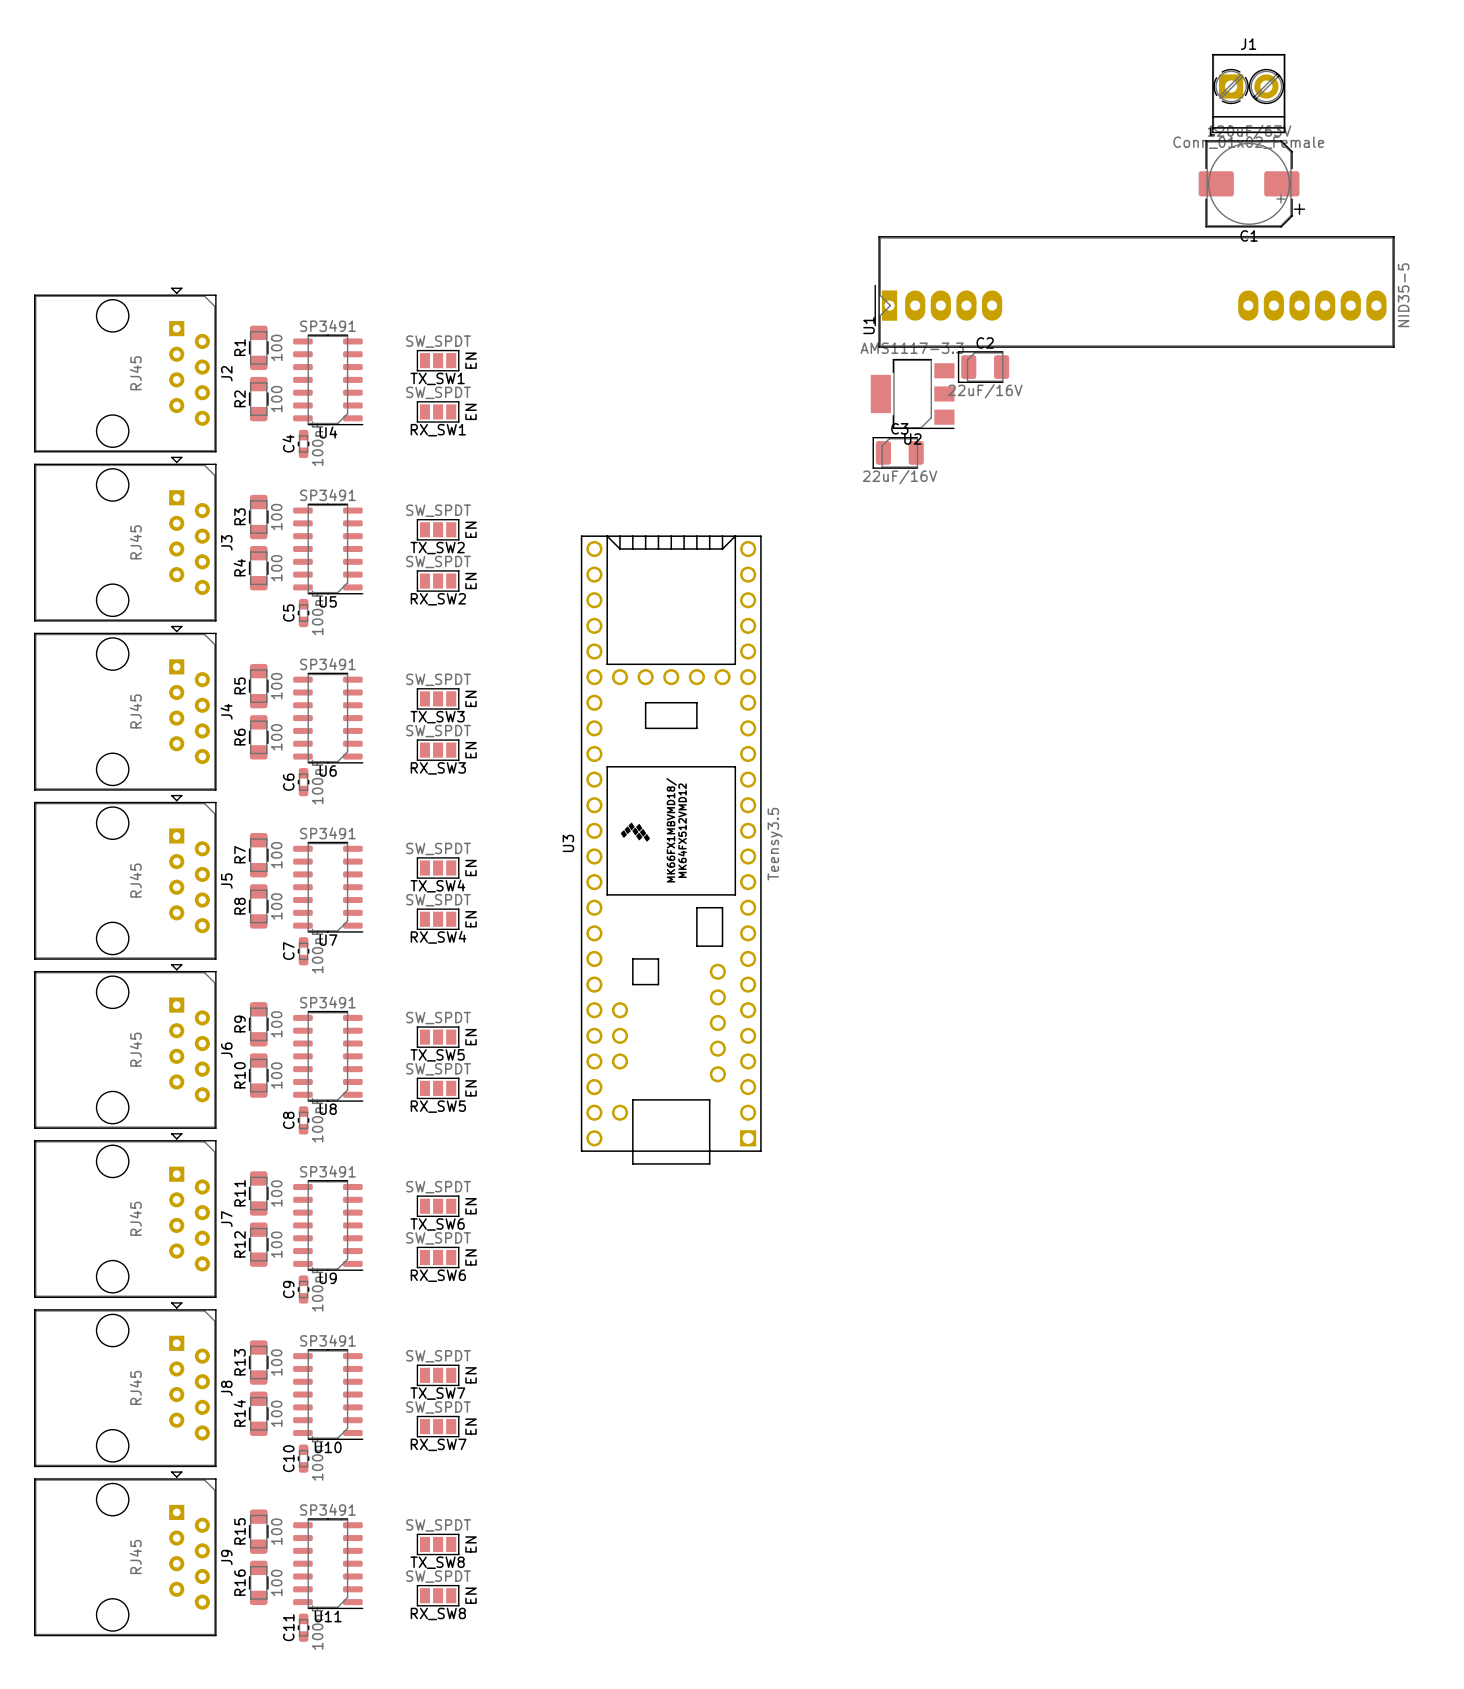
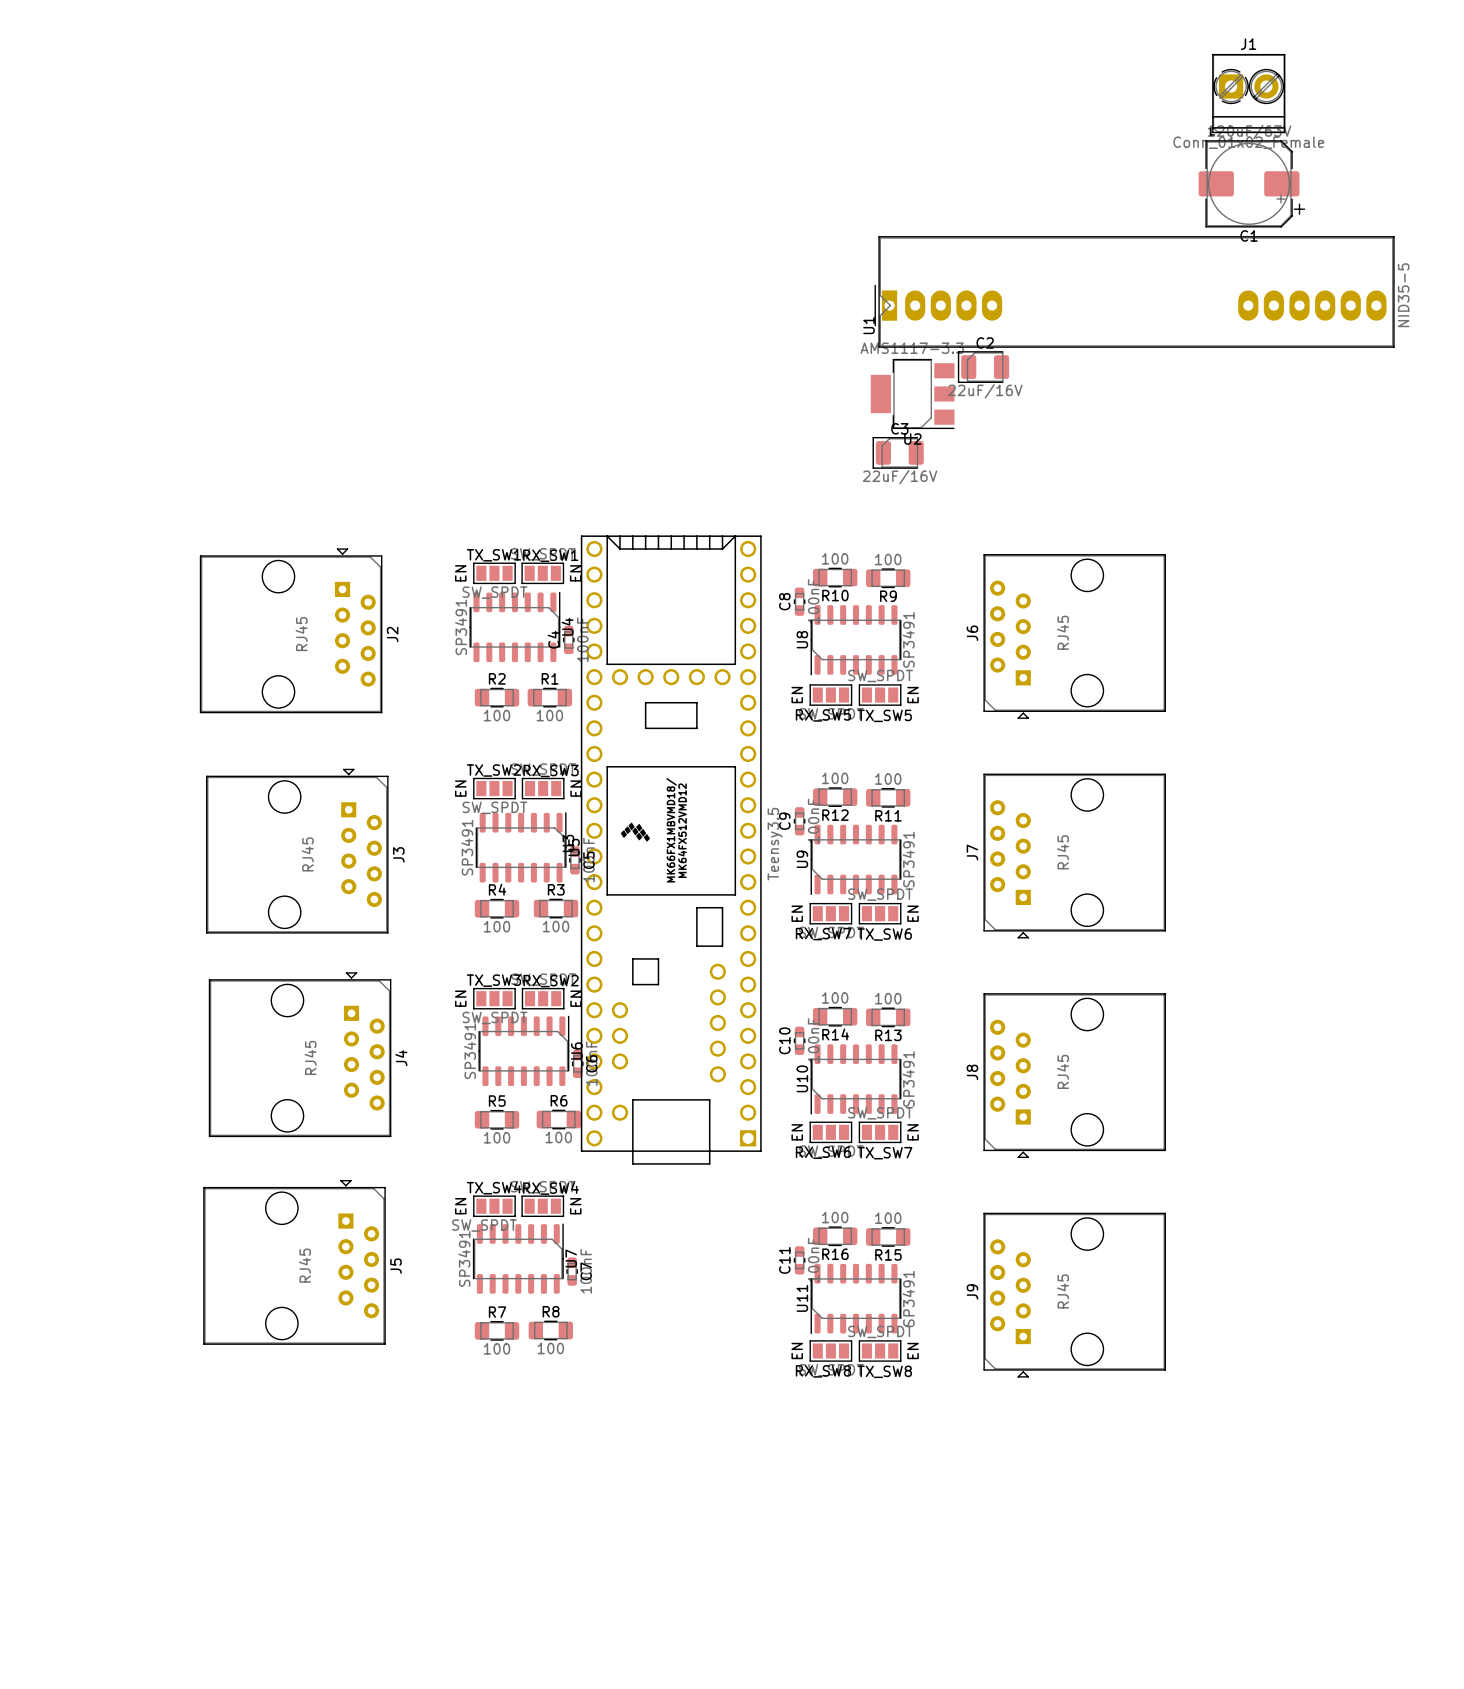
R1 rotation: 0° (258, 347) -> 90° clockwise (549, 697)
R1 position: (258, 347) -> (549, 697)
TX_SW1 rotation: 0° (438, 360) -> 180° (494, 573)
TX_SW1 position: (438, 360) -> (494, 573)
J2 position: (125, 370) -> (291, 630)
U4 rotation: 0° (328, 379) -> 90° counterclockwise (514, 627)
U4 position: (328, 379) -> (514, 627)
R2 rotation: 0° (258, 399) -> 90° clockwise (497, 697)
R2 position: (258, 399) -> (497, 697)
RX_SW1 position: (438, 411) -> (542, 573)
RX_SW1 name position: RX_SW1 (438, 430) -> RX_SW1 (550, 555)
C4 position: (303, 443) -> (568, 639)
R3 rotation: 0° (258, 517) -> 90° clockwise (556, 908)
R3 position: (258, 517) -> (556, 908)
TX_SW2 rotation: 0° (438, 529) -> 180° (494, 788)
TX_SW2 position: (438, 529) -> (494, 788)
J3 position: (125, 539) -> (297, 851)
U5 rotation: 0° (328, 548) -> 90° counterclockwise (521, 847)
U5 position: (328, 548) -> (521, 847)
R4 rotation: 0° (258, 568) -> 90° clockwise (497, 908)
R4 position: (258, 568) -> (497, 908)
RX_SW2 position: (438, 581) -> (543, 998)
RX_SW2 name position: RX_SW2 (438, 599) -> RX_SW2 (551, 981)
C5 name position: C5 (288, 613) -> C5 (588, 860)
C5 position: (303, 613) -> (574, 860)
R5 rotation: 0° (258, 686) -> 90° clockwise (497, 1119)
R5 position: (258, 686) -> (497, 1119)
TX_SW3 rotation: 0° (438, 698) -> 180° (494, 998)
TX_SW3 position: (438, 698) -> (494, 998)
J4 position: (125, 708) -> (300, 1054)
U6 rotation: 0° (328, 718) -> 90° counterclockwise (523, 1050)
U6 position: (328, 718) -> (523, 1050)
R6 rotation: 0° (258, 737) -> 90° clockwise (558, 1119)
R6 position: (258, 737) -> (558, 1119)
RX_SW3 position: (438, 750) -> (543, 788)
RX_SW3 name position: RX_SW3 (438, 768) -> RX_SW3 (551, 770)
C6 name position: C6 (288, 782) -> C6 (591, 1063)
C6 position: (303, 782) -> (577, 1063)
R7 rotation: 0° (258, 855) -> 90° clockwise (497, 1330)
R7 position: (258, 855) -> (497, 1330)
TX_SW4 rotation: 0° (438, 868) -> 180° (494, 1206)
TX_SW4 position: (438, 868) -> (494, 1206)
J5 position: (125, 877) -> (294, 1262)
U7 rotation: 0° (328, 887) -> 90° counterclockwise (518, 1258)
U7 position: (328, 887) -> (518, 1258)
R8 rotation: 0° (258, 906) -> 90° clockwise (550, 1330)
R8 position: (258, 906) -> (550, 1330)
RX_SW4 position: (438, 919) -> (542, 1206)
RX_SW4 name position: RX_SW4 (438, 937) -> RX_SW4 (550, 1188)
C7 name position: C7 (288, 951) -> C7 (586, 1271)
C7 position: (303, 951) -> (572, 1271)
R9 name position: R9 (239, 1024) -> R9 (888, 596)
R9 rotation: 0° (258, 1024) -> 90° clockwise (888, 578)
R9 position: (258, 1024) -> (888, 578)
R9 value position: 100 (276, 1024) -> 100 (888, 559)
TX_SW5 position: (438, 1037) -> (880, 695)
J6 rotation: 0° (125, 1046) -> 180° (1074, 636)
J6 position: (125, 1046) -> (1074, 636)
TX_SW5 name position: TX_SW5 (437, 1055) -> TX_SW5 (884, 715)
U8 rotation: 0° (328, 1056) -> 90° clockwise (856, 640)
U8 position: (328, 1056) -> (856, 640)
R10 name position: R10 (239, 1075) -> R10 (835, 595)
R10 rotation: 0° (258, 1075) -> 90° clockwise (835, 577)
R10 position: (258, 1075) -> (835, 577)
R10 value position: 100 (276, 1075) -> 100 (835, 558)
RX_SW5 rotation: 0° (438, 1088) -> 180° (830, 695)
RX_SW5 position: (438, 1088) -> (830, 695)
C8 position: (303, 1120) -> (799, 601)
R11 name position: R11 (239, 1193) -> R11 (888, 815)
R11 rotation: 0° (258, 1193) -> 90° clockwise (888, 797)
R11 position: (258, 1193) -> (888, 797)
R11 value position: 100 (276, 1193) -> 100 (888, 779)
TX_SW6 position: (438, 1206) -> (880, 913)
J7 rotation: 0° (125, 1215) -> 180° (1074, 856)
J7 position: (125, 1215) -> (1074, 856)
TX_SW6 name position: TX_SW6 (437, 1224) -> TX_SW6 (884, 934)
U9 rotation: 0° (328, 1225) -> 90° clockwise (856, 859)
U9 position: (328, 1225) -> (856, 859)
R12 name position: R12 (239, 1244) -> R12 (835, 815)
R12 rotation: 0° (258, 1244) -> 90° clockwise (835, 797)
R12 position: (258, 1244) -> (835, 797)
R12 value position: 100 (276, 1244) -> 100 (835, 778)
RX_SW6 rotation: 0° (438, 1257) -> 180° (830, 1132)
RX_SW6 position: (438, 1257) -> (830, 1132)
C9 position: (303, 1289) -> (799, 821)
R13 name position: R13 (239, 1362) -> R13 (888, 1035)
R13 rotation: 0° (258, 1362) -> 90° clockwise (888, 1017)
R13 position: (258, 1362) -> (888, 1017)
R13 value position: 100 (276, 1362) -> 100 (888, 998)
TX_SW7 position: (438, 1375) -> (880, 1132)
J8 rotation: 0° (125, 1384) -> 180° (1074, 1075)
J8 position: (125, 1384) -> (1074, 1075)
TX_SW7 name position: TX_SW7 (437, 1393) -> TX_SW7 (884, 1153)
U10 rotation: 0° (328, 1394) -> 90° clockwise (856, 1079)
U10 position: (328, 1394) -> (856, 1079)
R14 name position: R14 (239, 1413) -> R14 (835, 1034)
R14 rotation: 0° (258, 1413) -> 90° clockwise (835, 1016)
R14 position: (258, 1413) -> (835, 1016)
R14 value position: 100 (276, 1413) -> 100 (835, 997)
RX_SW7 rotation: 0° (438, 1426) -> 180° (830, 913)
RX_SW7 position: (438, 1426) -> (830, 913)
C10 position: (303, 1458) -> (799, 1040)
R15 name position: R15 (239, 1531) -> R15 (888, 1254)
R15 rotation: 0° (258, 1531) -> 90° clockwise (888, 1236)
R15 position: (258, 1531) -> (888, 1236)
R15 value position: 100 (276, 1531) -> 100 (888, 1218)
TX_SW8 position: (438, 1544) -> (880, 1351)
J9 rotation: 0° (125, 1553) -> 180° (1074, 1295)
J9 position: (125, 1553) -> (1074, 1295)
TX_SW8 name position: TX_SW8 (437, 1562) -> TX_SW8 (884, 1371)
U11 rotation: 0° (328, 1563) -> 90° clockwise (856, 1298)
U11 position: (328, 1563) -> (856, 1298)
R16 name position: R16 (239, 1582) -> R16 (835, 1254)
R16 rotation: 0° (258, 1582) -> 90° clockwise (835, 1236)
R16 position: (258, 1582) -> (835, 1236)
R16 value position: 100 (276, 1582) -> 100 (835, 1217)
RX_SW8 rotation: 0° (438, 1595) -> 180° (830, 1351)
RX_SW8 position: (438, 1595) -> (830, 1351)
C11 position: (303, 1627) -> (799, 1260)

